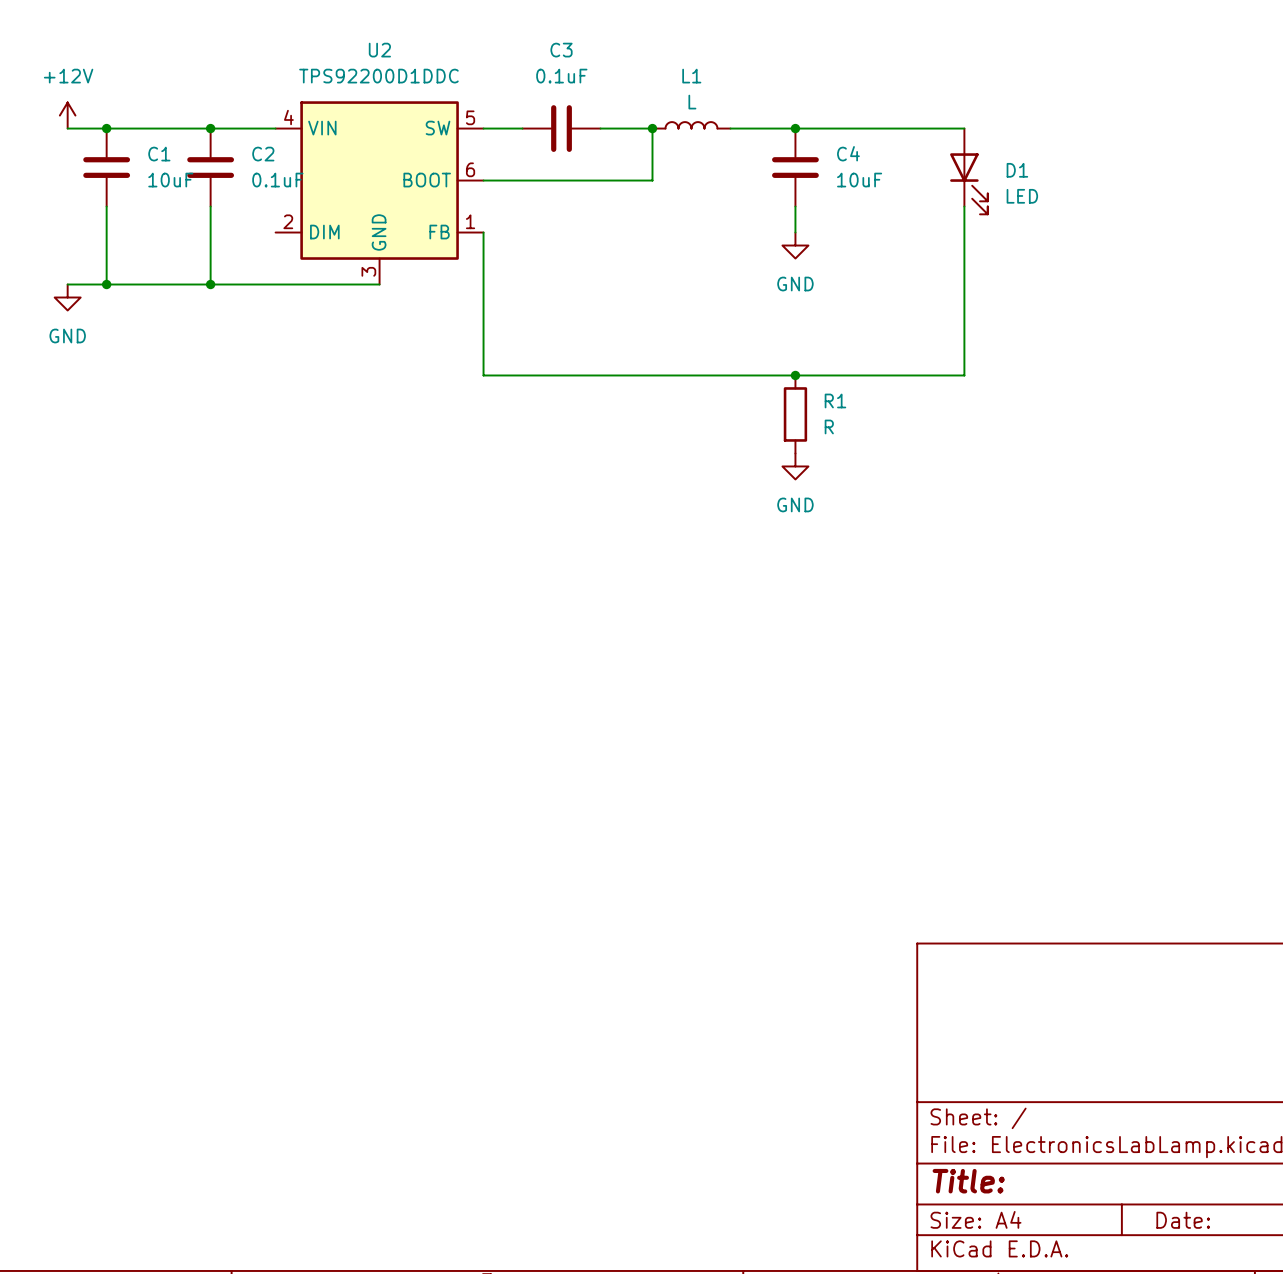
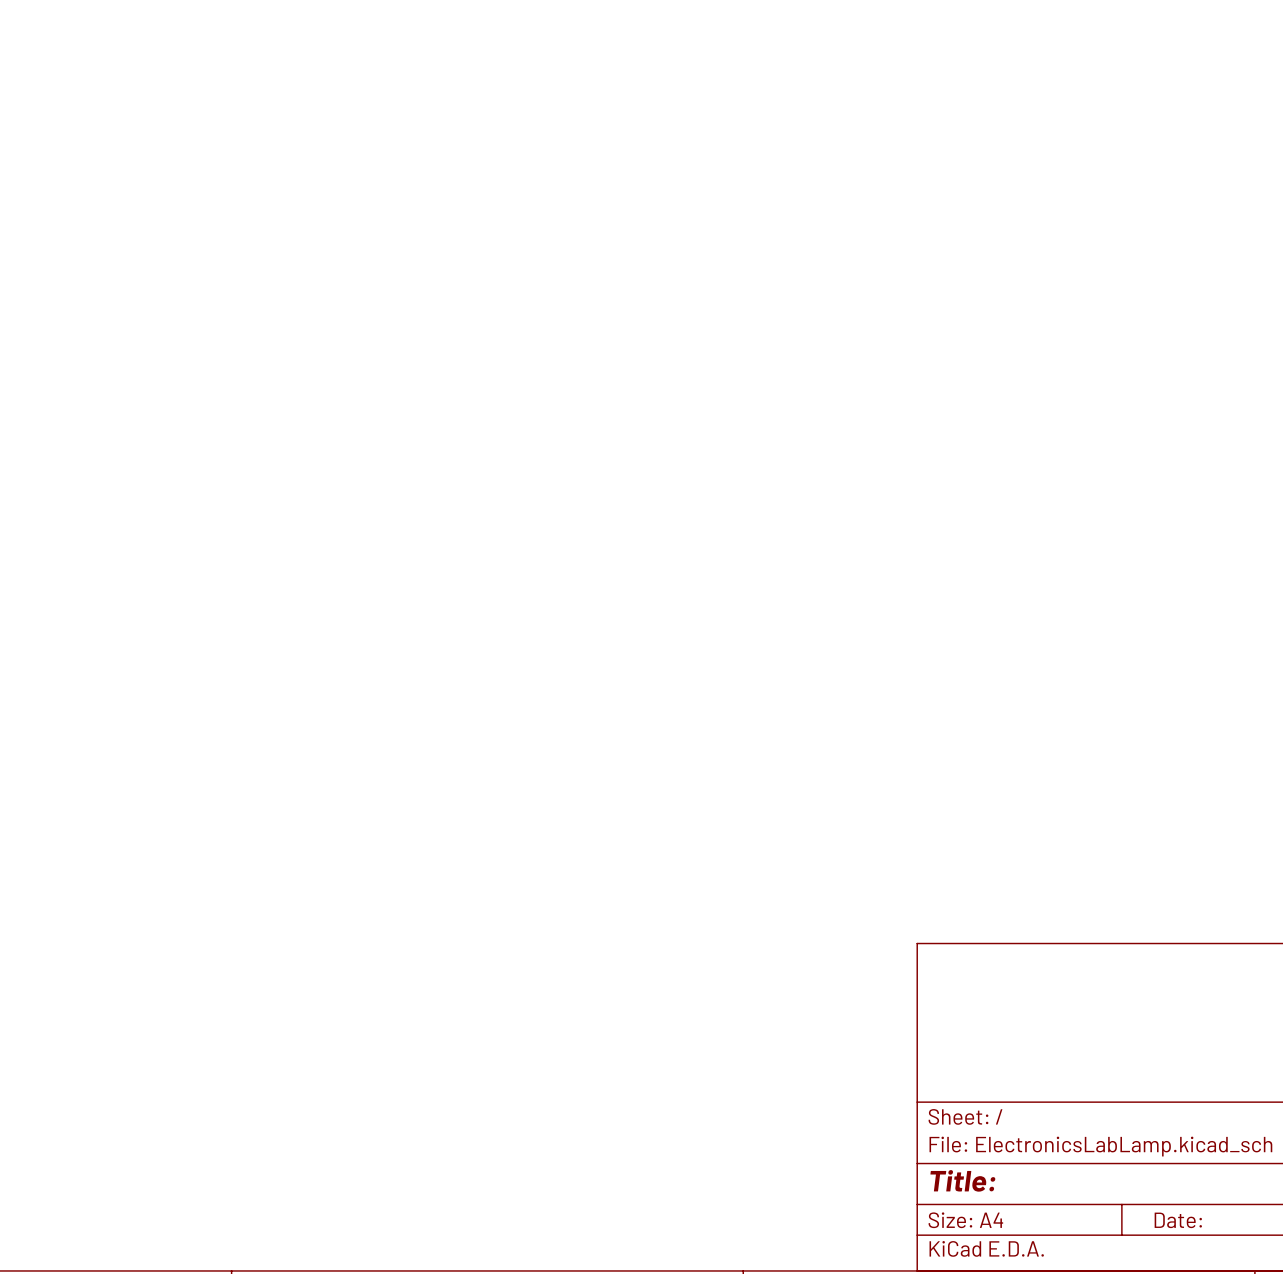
power symbol: +12V (67, 115) -> none
L1: L (691, 125) -> none
wire: (67, 128) (275, 128) -> none
junction: (106, 128) -> none
junction: (210, 128) -> none
wire: (483, 128) (522, 128) -> none
C3: 0.1uF (561, 128) -> none
wire: (600, 128) (652, 128) (652, 180) (483, 180) -> none
junction: (652, 128) -> none
wire: (730, 128) (964, 128) -> none
junction: (795, 128) -> none
C1: 10uF (106, 167) -> none
C2: 0.1uF (210, 167) -> none
C4: 10uF (795, 167) -> none
D1: LED (968, 171) -> none
U2: TPS92200D1DDC (379, 192) -> none
wire: (106, 206) (106, 284) -> none
wire: (210, 206) (210, 284) -> none
wire: (795, 206) (795, 232) -> none
wire: (964, 206) (964, 375) (483, 375) (483, 232) -> none
power symbol: GND (795, 245) -> none
wire: (67, 284) (379, 284) -> none
junction: (106, 284) -> none
junction: (210, 284) -> none
power symbol: GND (67, 297) -> none
junction: (795, 375) -> none
R1: R (795, 414) -> none
power symbol: GND (795, 466) -> none

